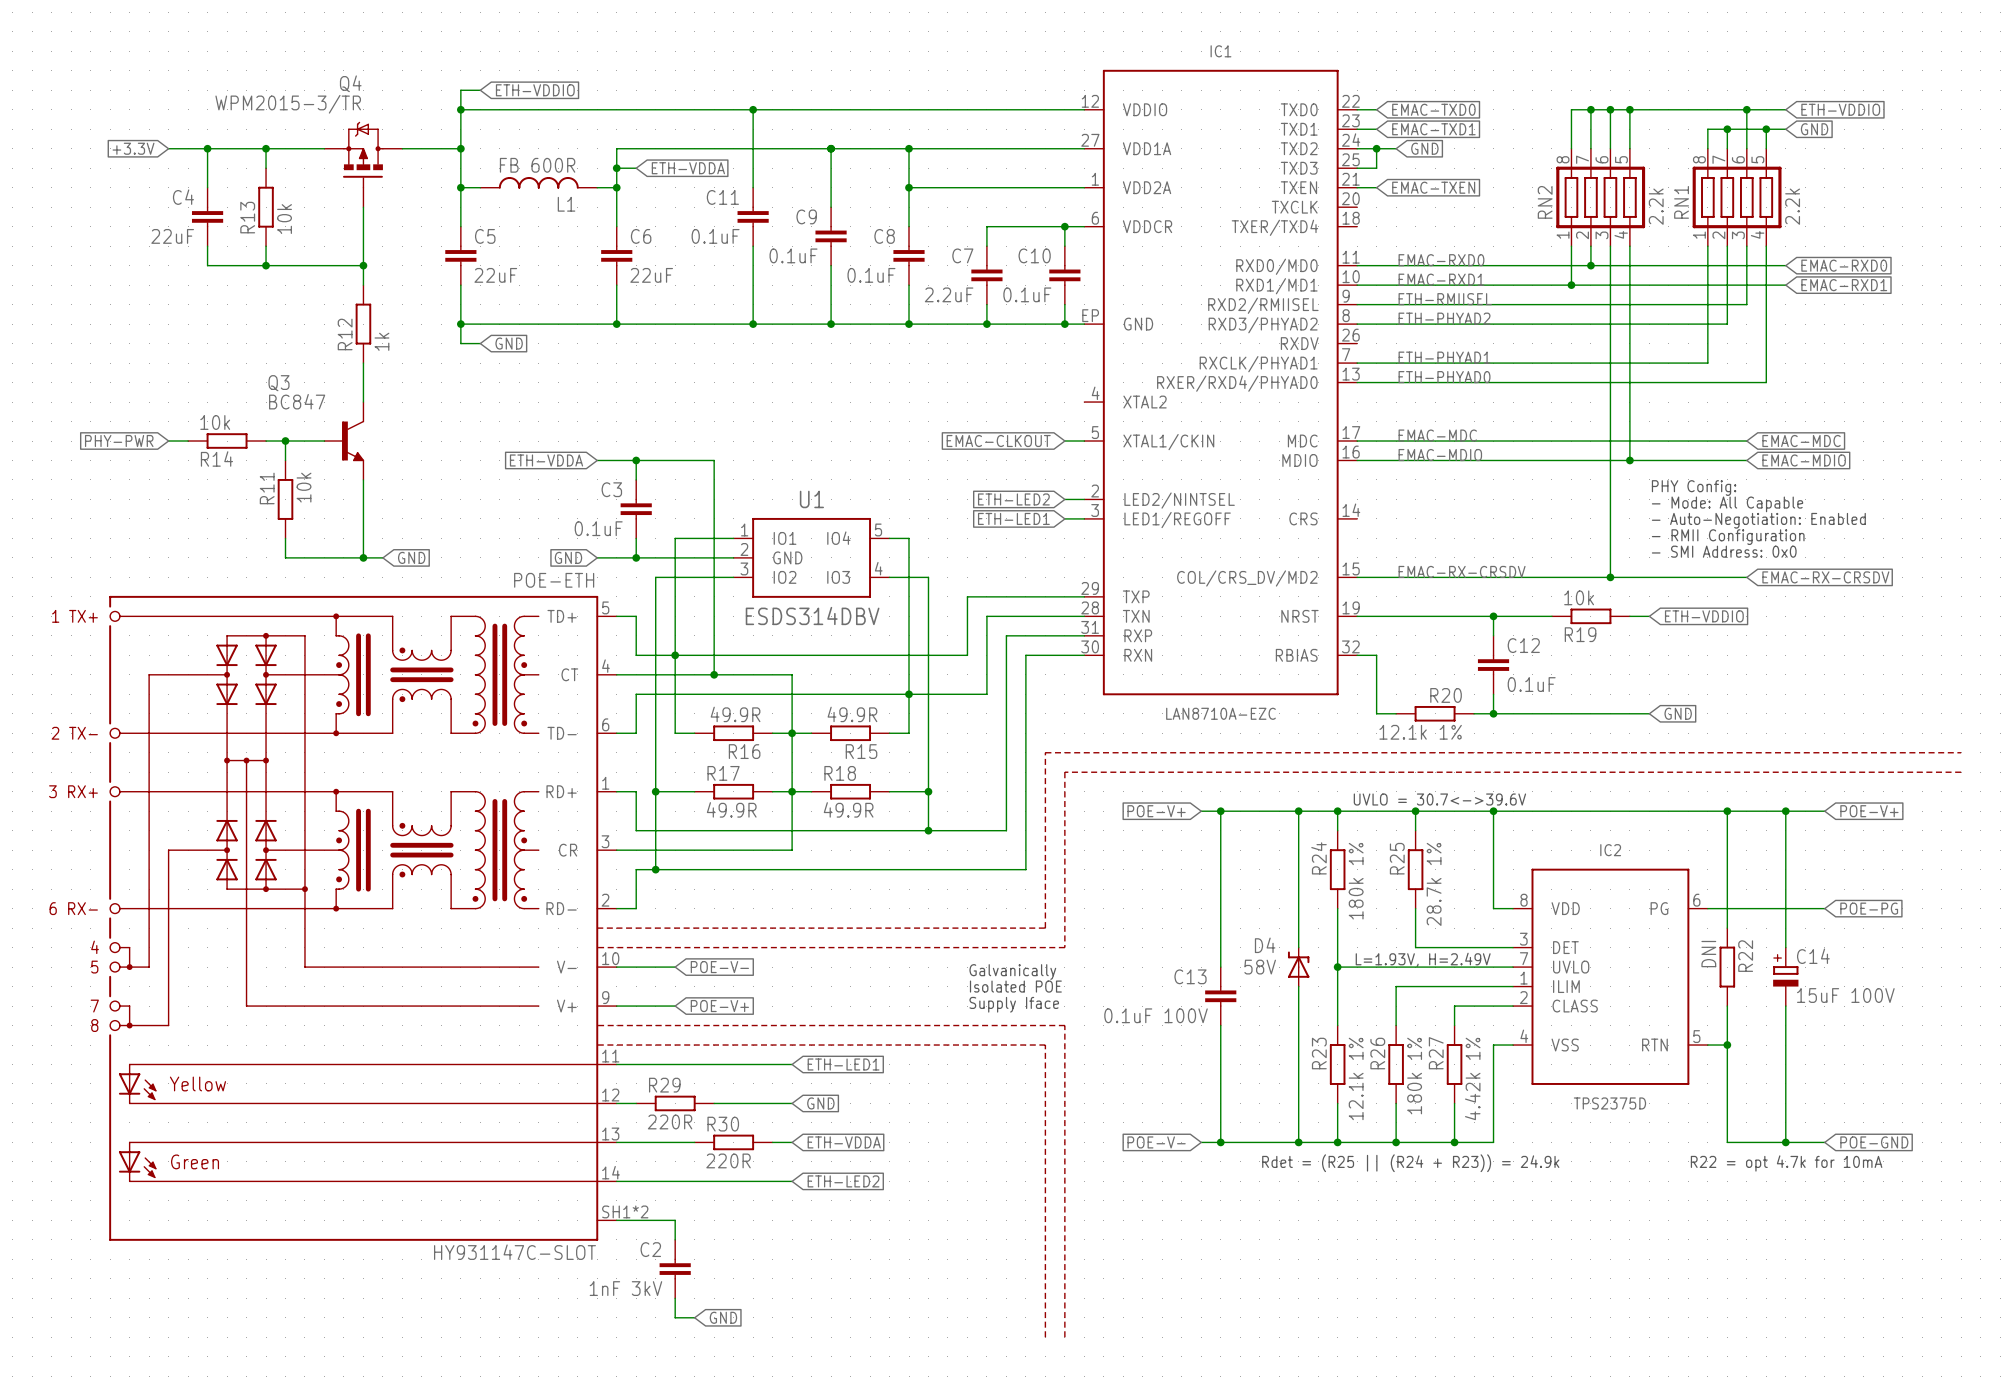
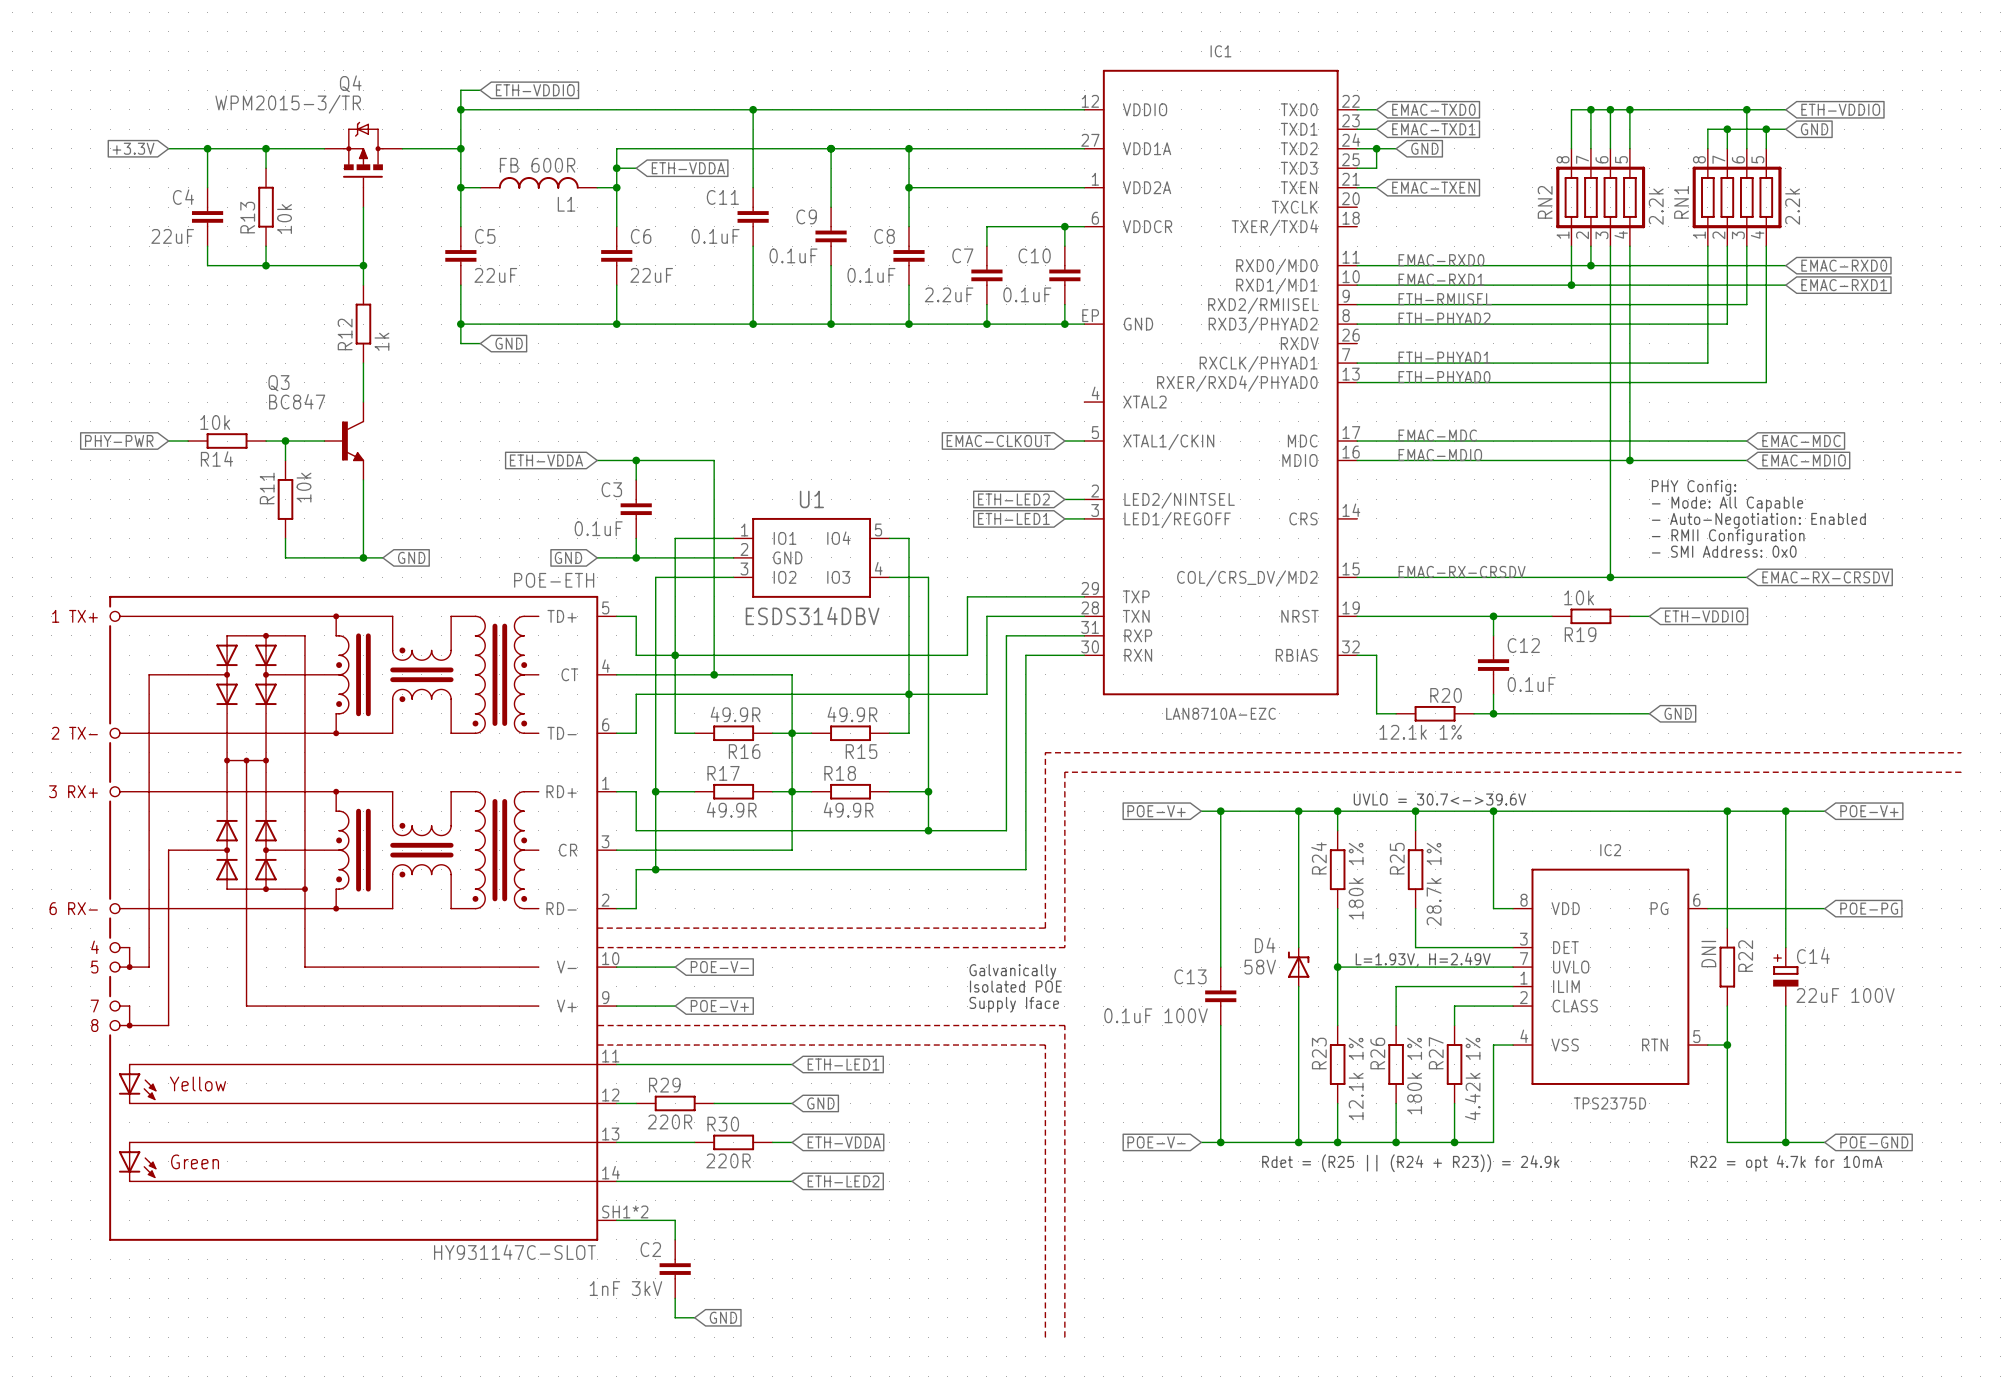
C14 value: 15uF 100V (1845, 995) -> 22uF 100V (1845, 995)

